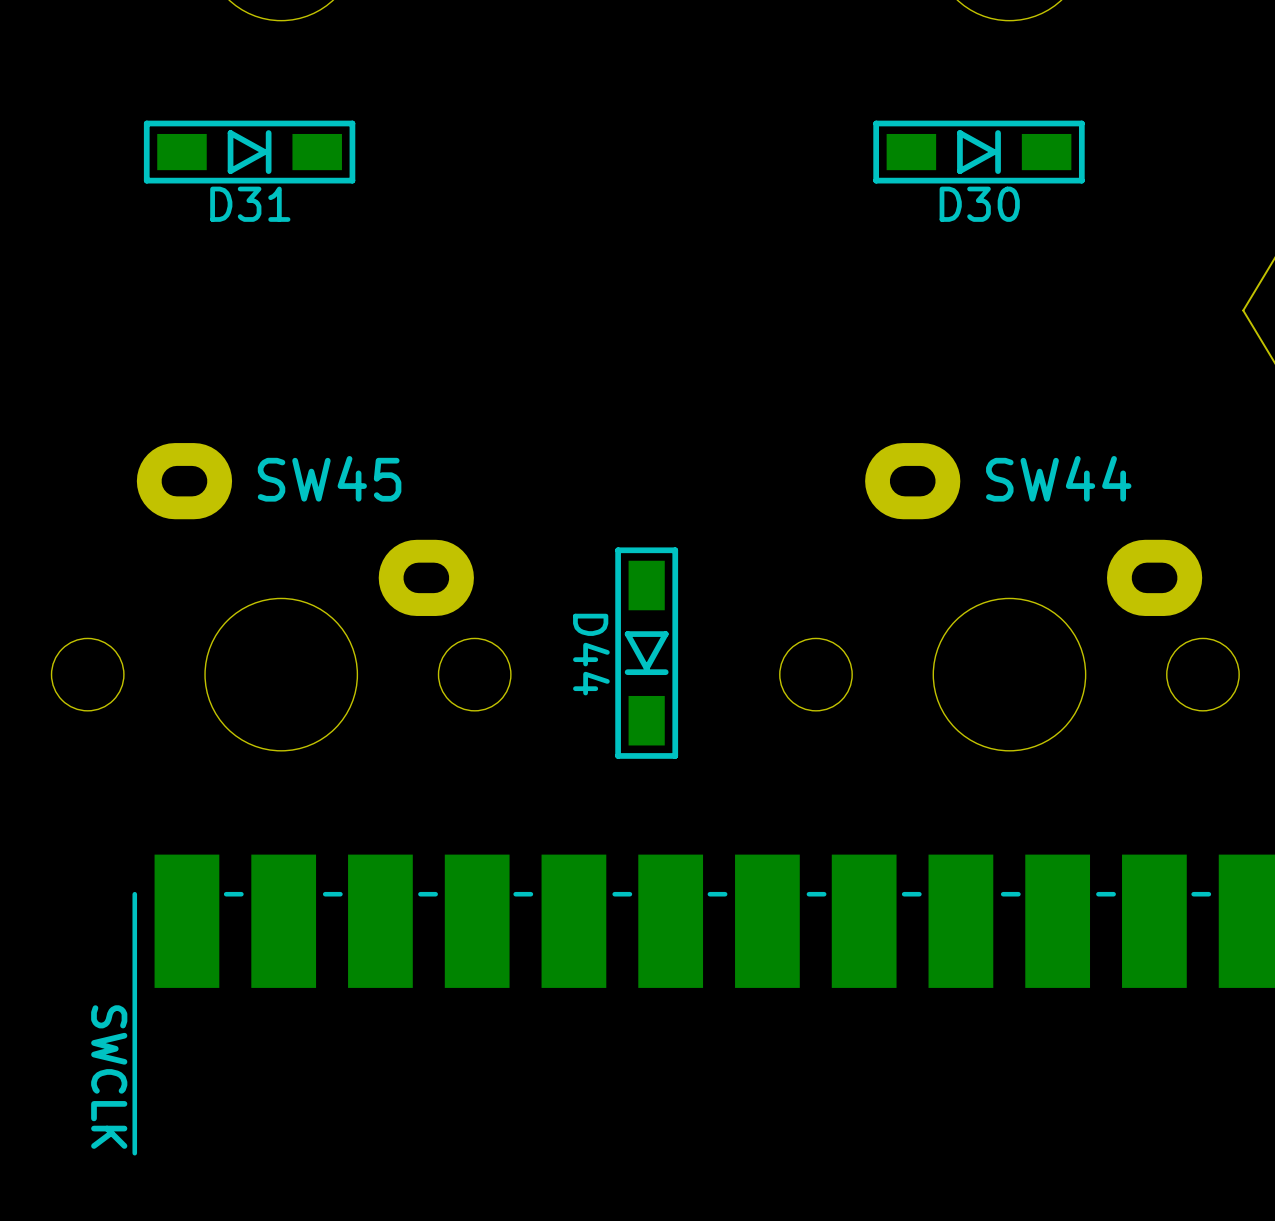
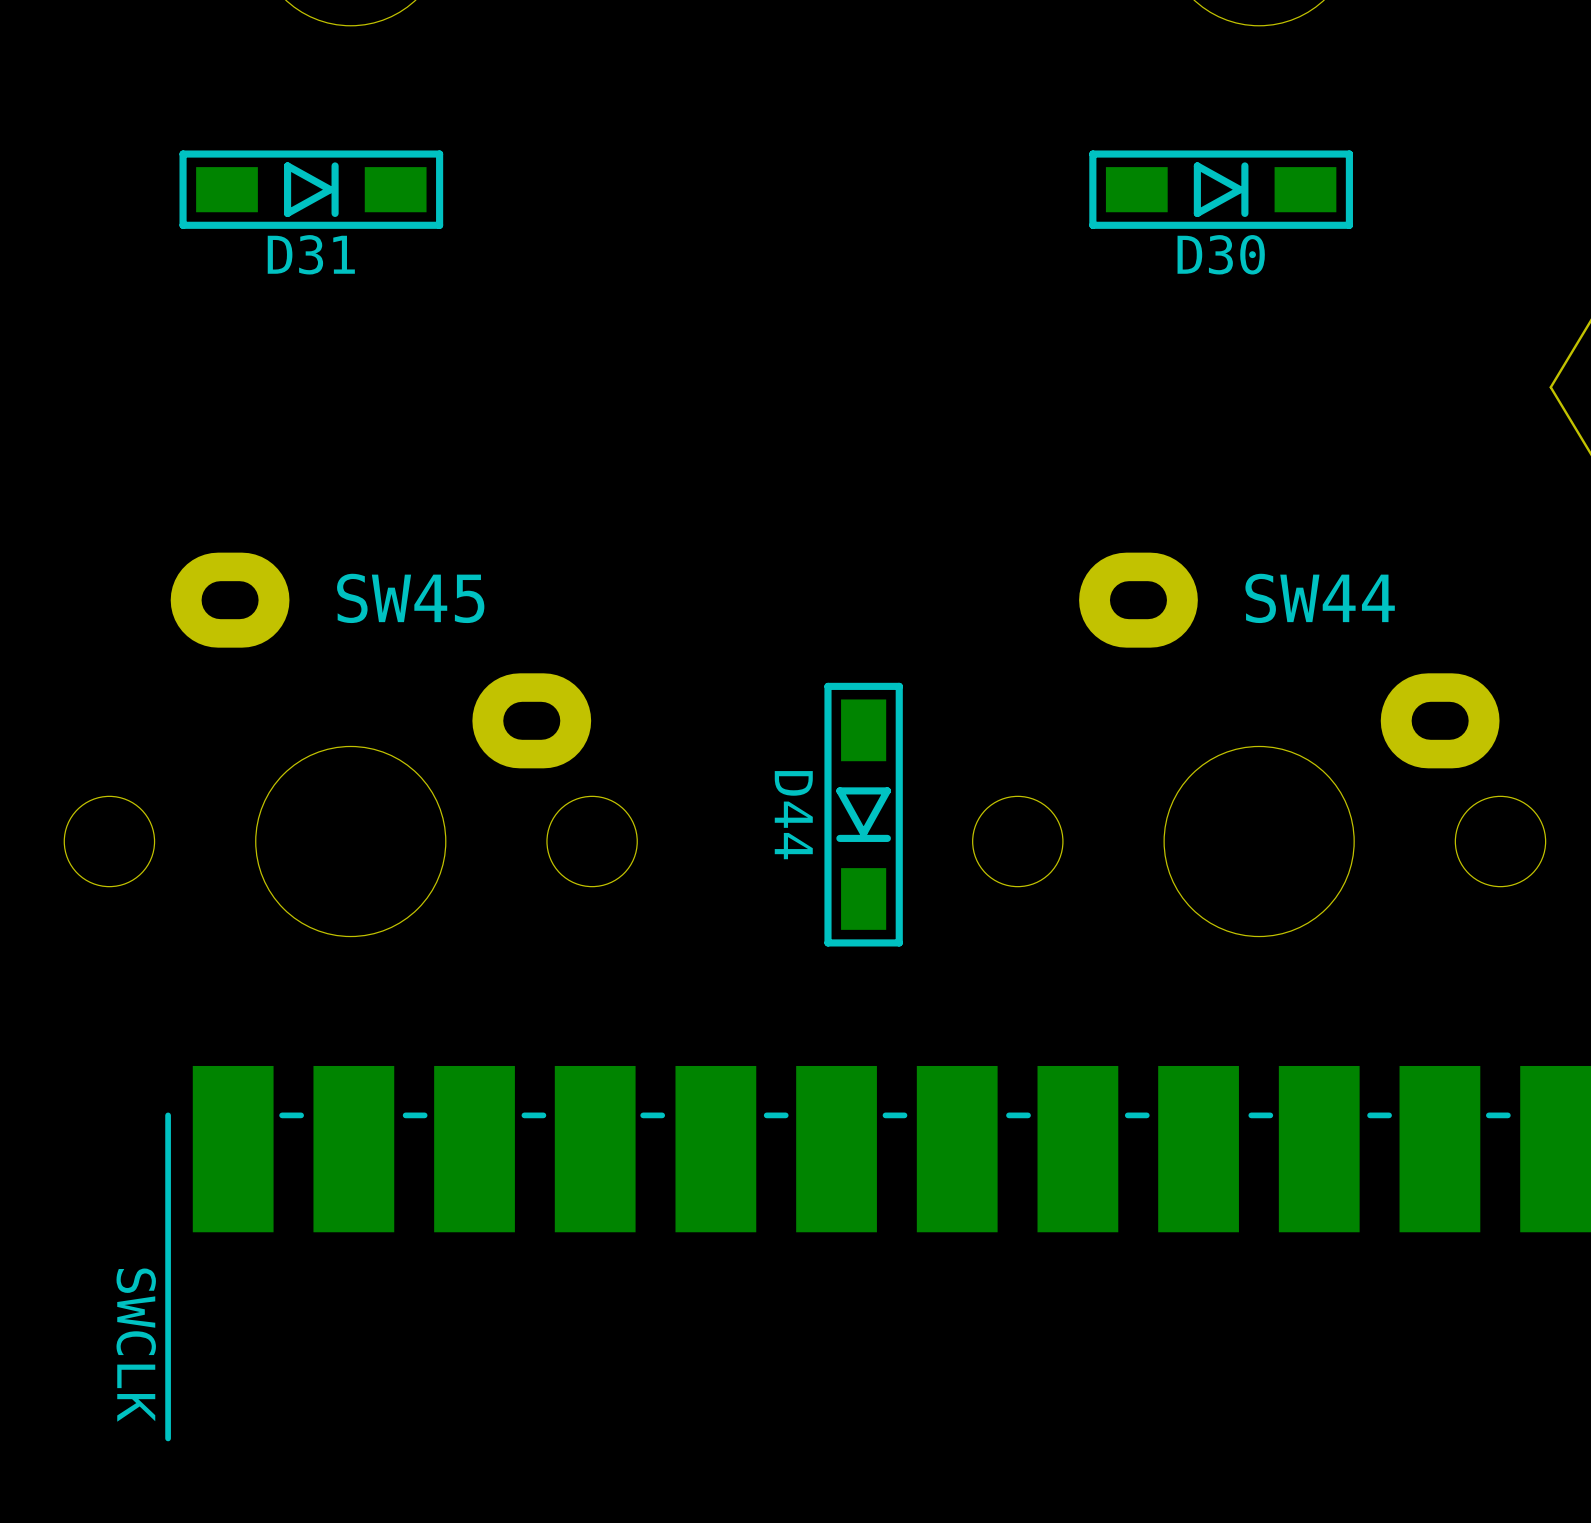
D44 position: (646, 653) -> (863, 814)

